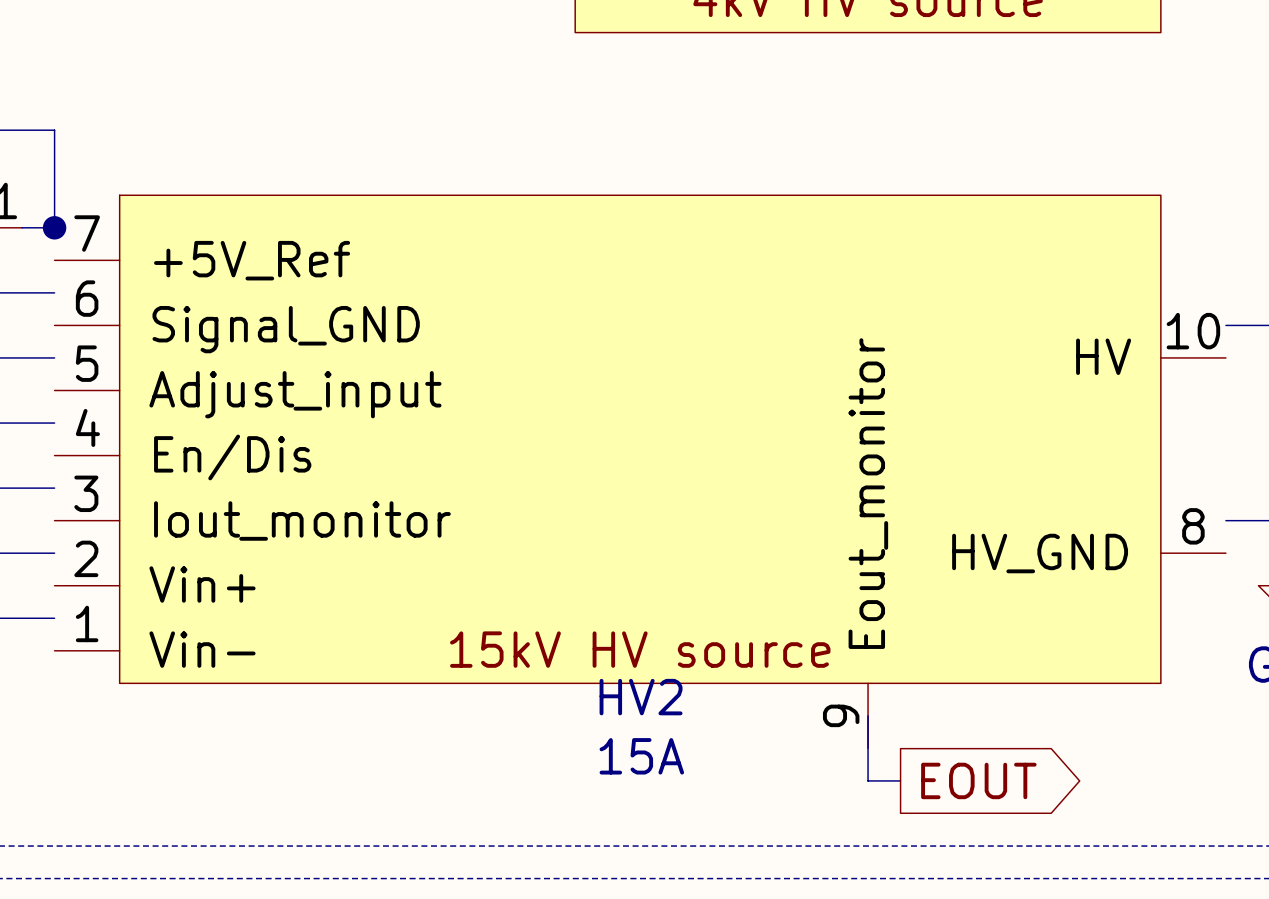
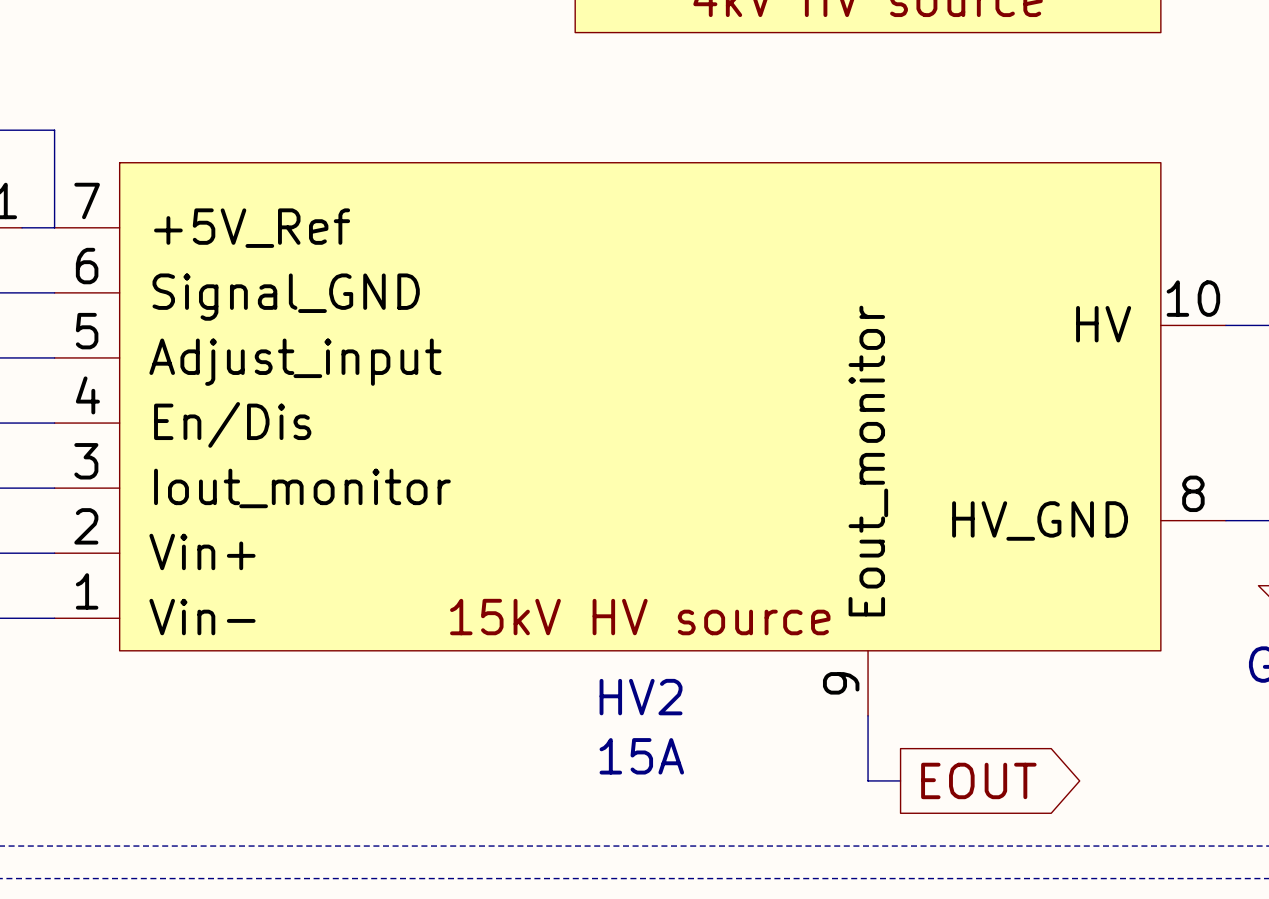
junction: (54, 227) -> none
HV2: none -> 15A (640, 439)
HV2: 15A (640, 471) -> none

